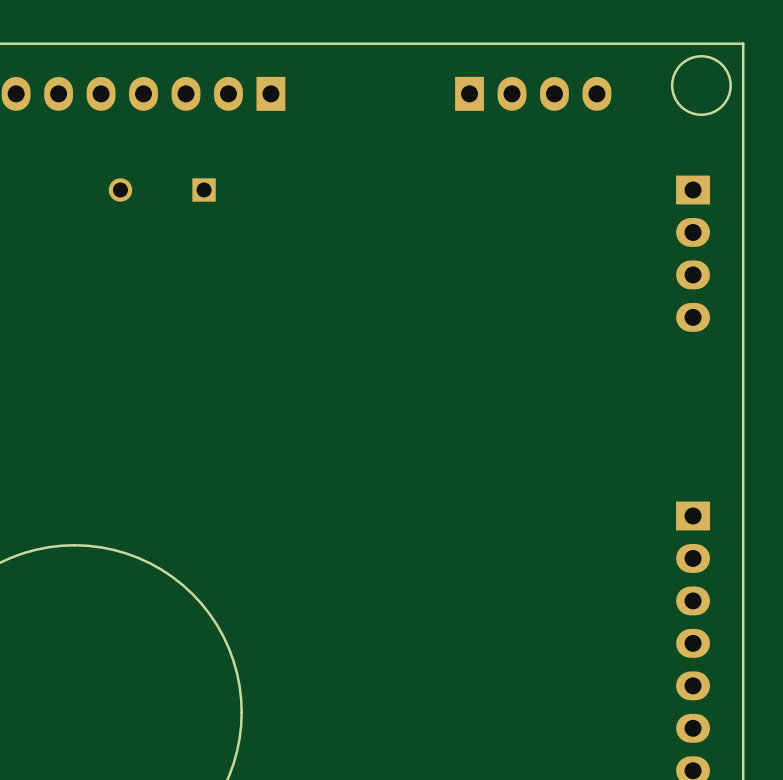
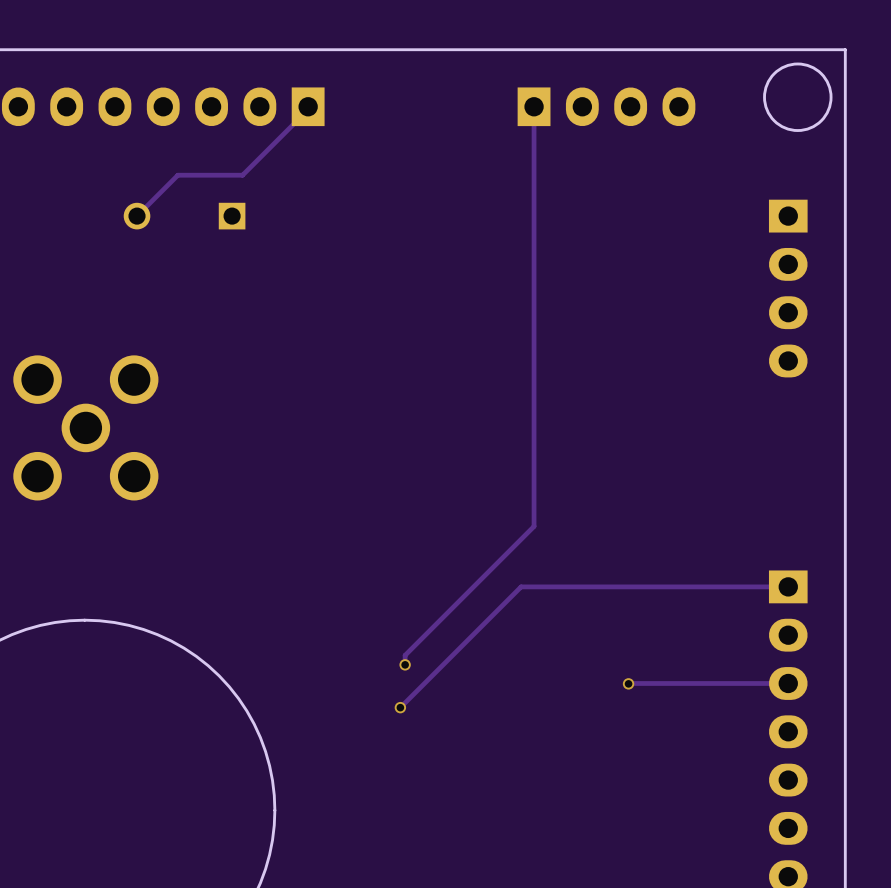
track: none -> (308, 106) (308, 109) (242, 175) (177, 175) (137, 216)
track: none -> (534, 106) (534, 526) (405, 655) (405, 664)
part: none -> (85, 427)
track: none -> (788, 586) (521, 586) (400, 707)
via: none -> (405, 664)
track: none -> (788, 683) (628, 683)
via: none -> (628, 683)
via: none -> (400, 707)

